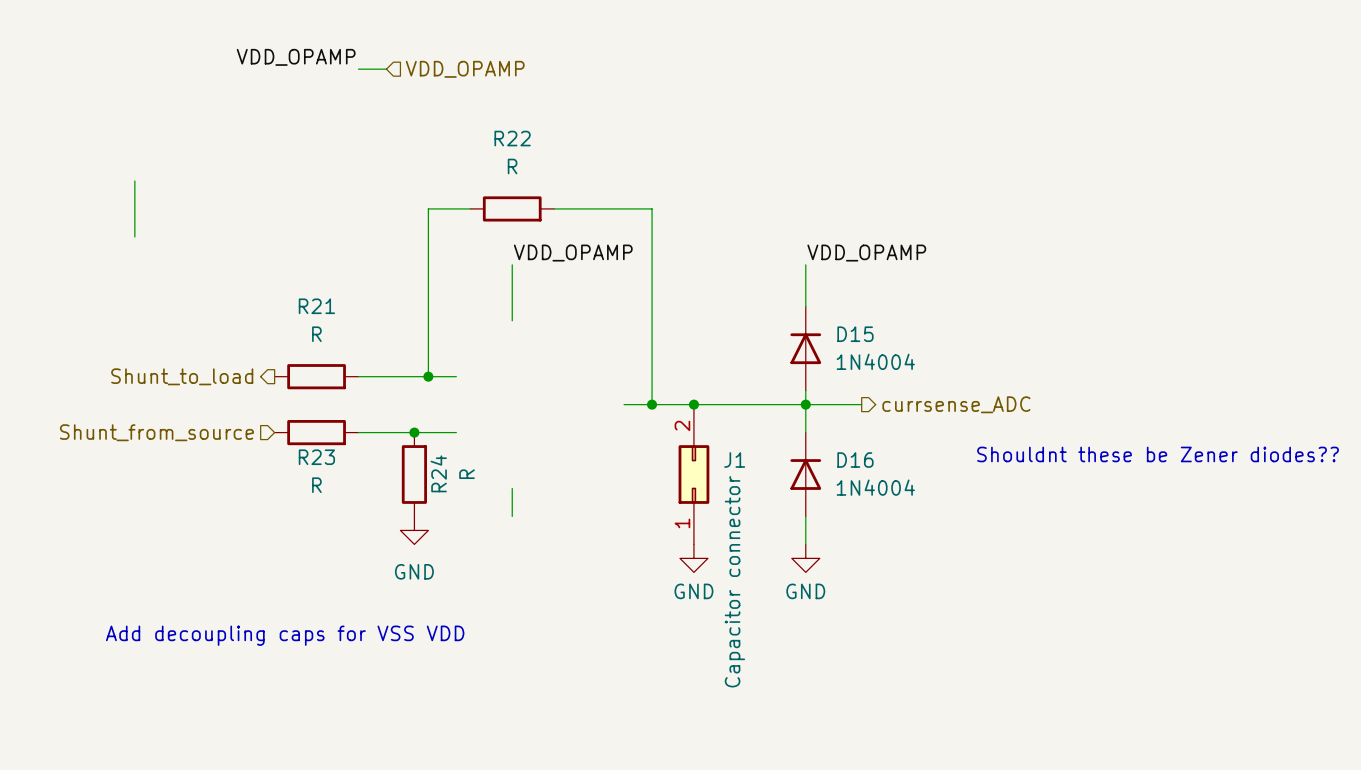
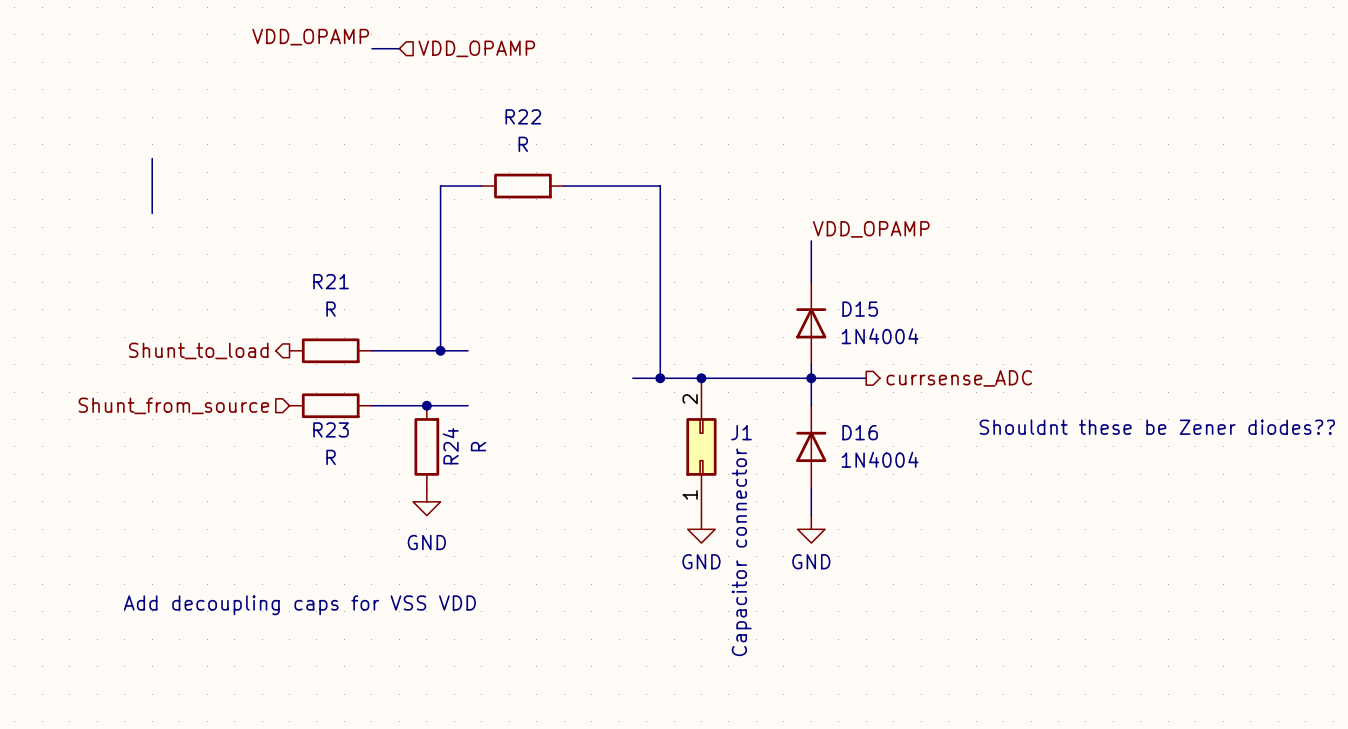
label: VDD_OPAMP (573, 253) -> none
wire: (512, 264) (512, 320) -> none
wire: (512, 488) (512, 516) -> none

